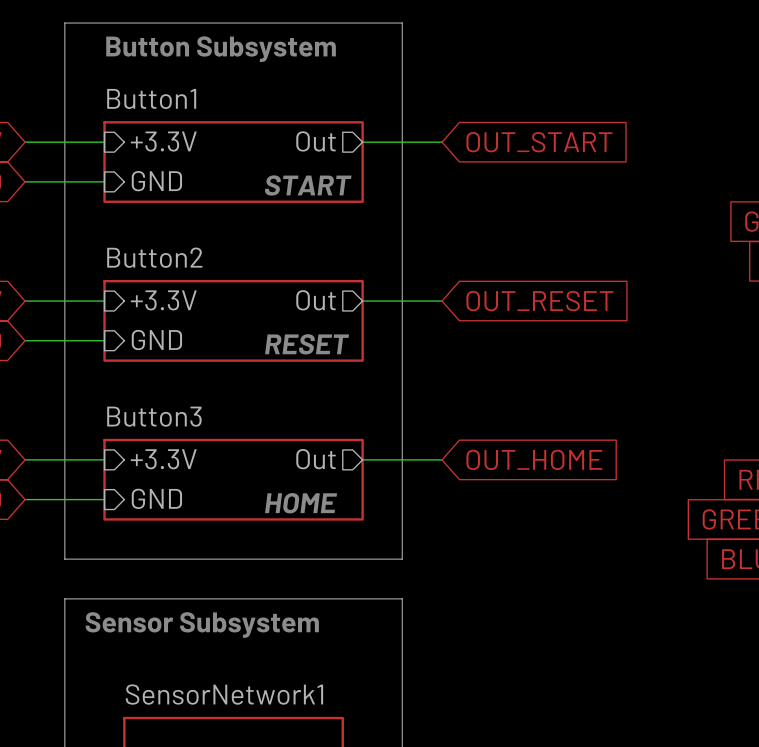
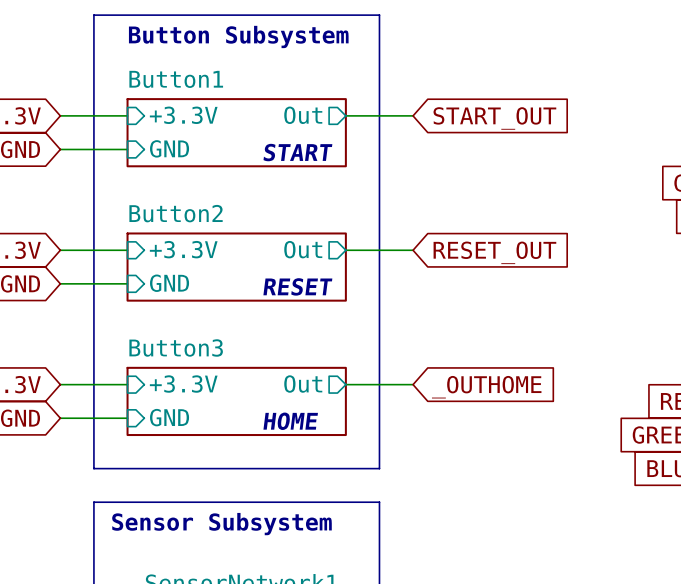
global label: OUT_START (539, 142) -> START_OUT (494, 118)
global label: OUT_RESET (539, 301) -> RESET_OUT (494, 252)
global label: OUT_HOME (534, 459) -> _OUTHOME (486, 387)

